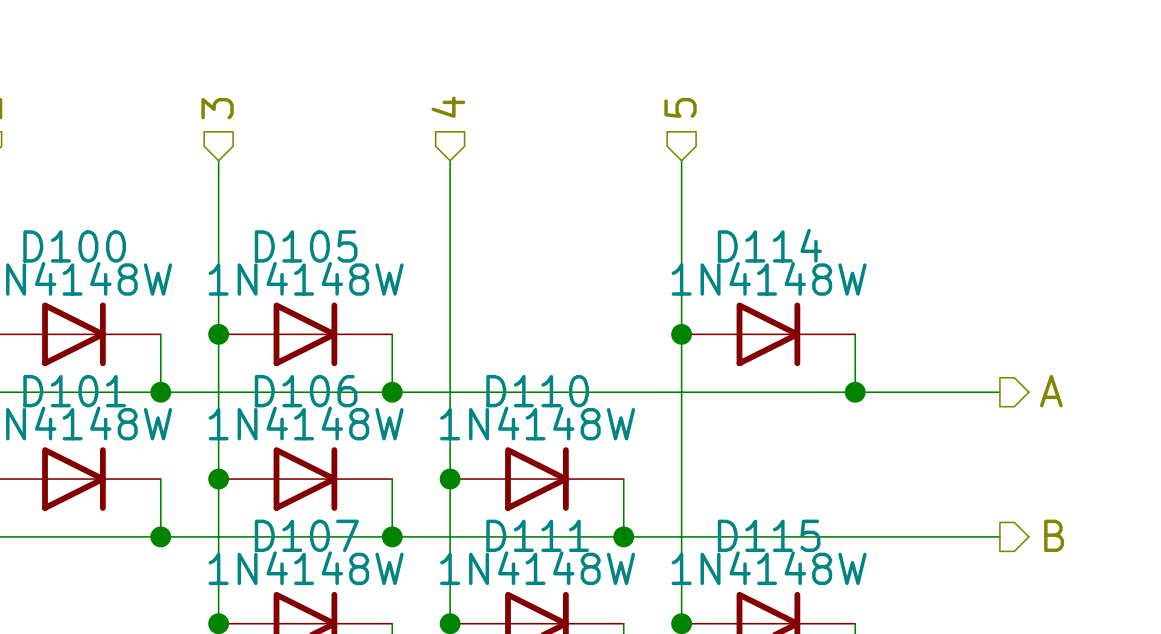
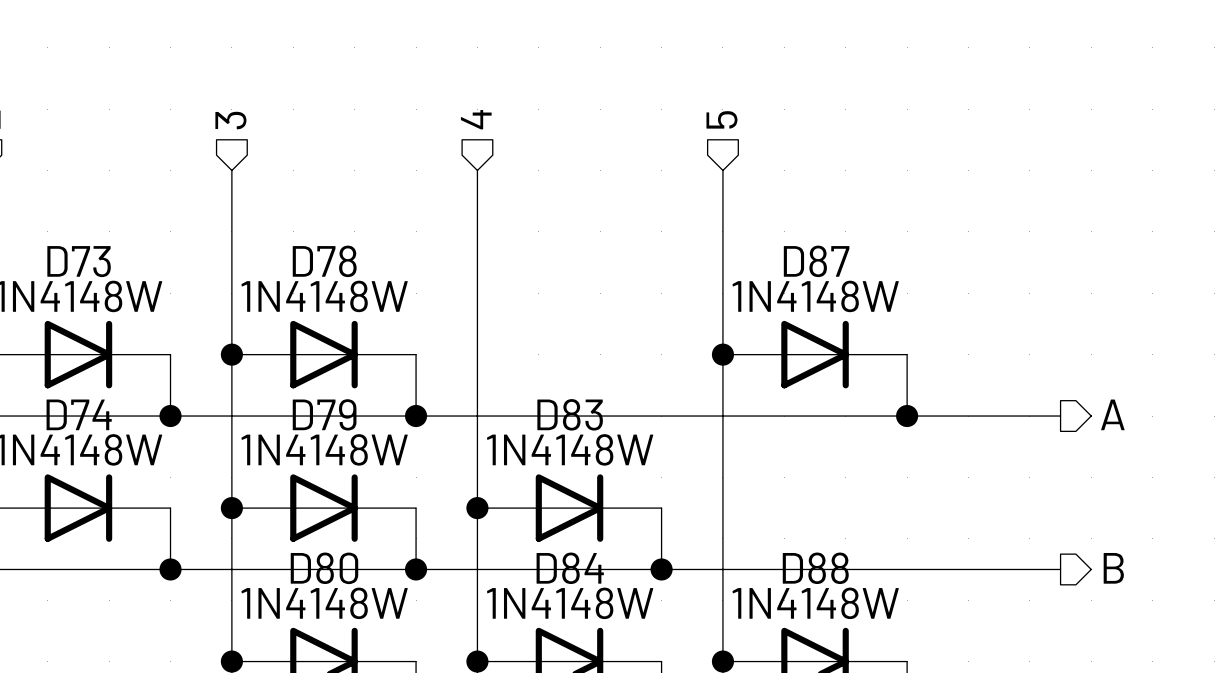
D114 name: D114 (769, 245) -> D87 (816, 261)
D100 name: D100 (74, 246) -> D73 (79, 261)
D105 name: D105 (306, 246) -> D78 (324, 261)
D101 name: D101 (74, 391) -> D74 (79, 414)
D106 name: D106 (306, 391) -> D79 (324, 414)
D110 name: D110 (537, 391) -> D83 (570, 414)
D107 name: D107 (306, 535) -> D80 (324, 568)
D111 name: D111 (537, 535) -> D84 (570, 568)
D115 name: D115 (769, 535) -> D88 (815, 568)

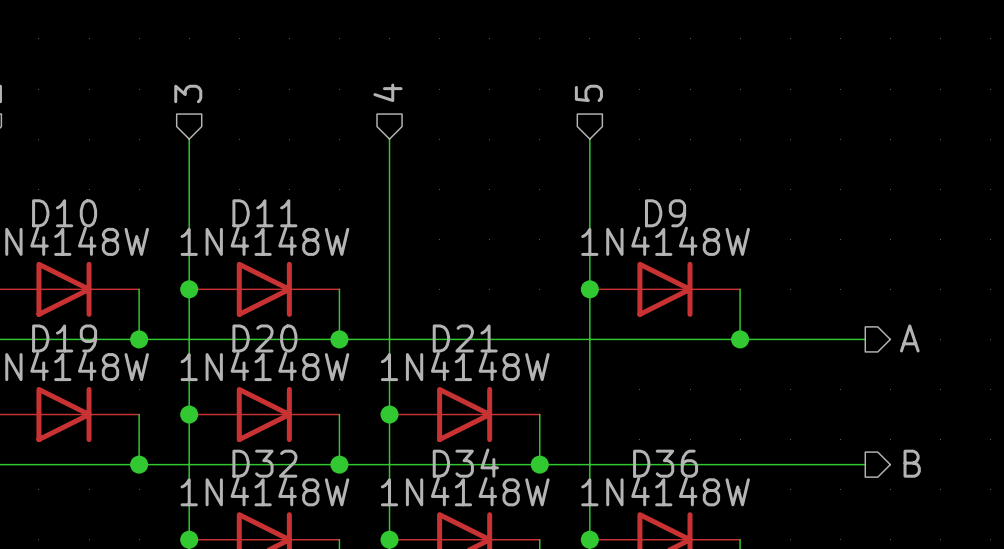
D73 name: D73 (79, 261) -> D10 (64, 213)
D78 name: D78 (324, 261) -> D11 (264, 213)
D87 name: D87 (816, 261) -> D9 (665, 213)
D74 name: D74 (79, 414) -> D19 (64, 338)
D79 name: D79 (324, 414) -> D20 (264, 338)
D83 name: D83 (570, 414) -> D21 (465, 338)
D80 name: D80 (324, 568) -> D32 (264, 463)
D84 name: D84 (570, 568) -> D34 (465, 463)
D88 name: D88 (815, 568) -> D36 (665, 463)

